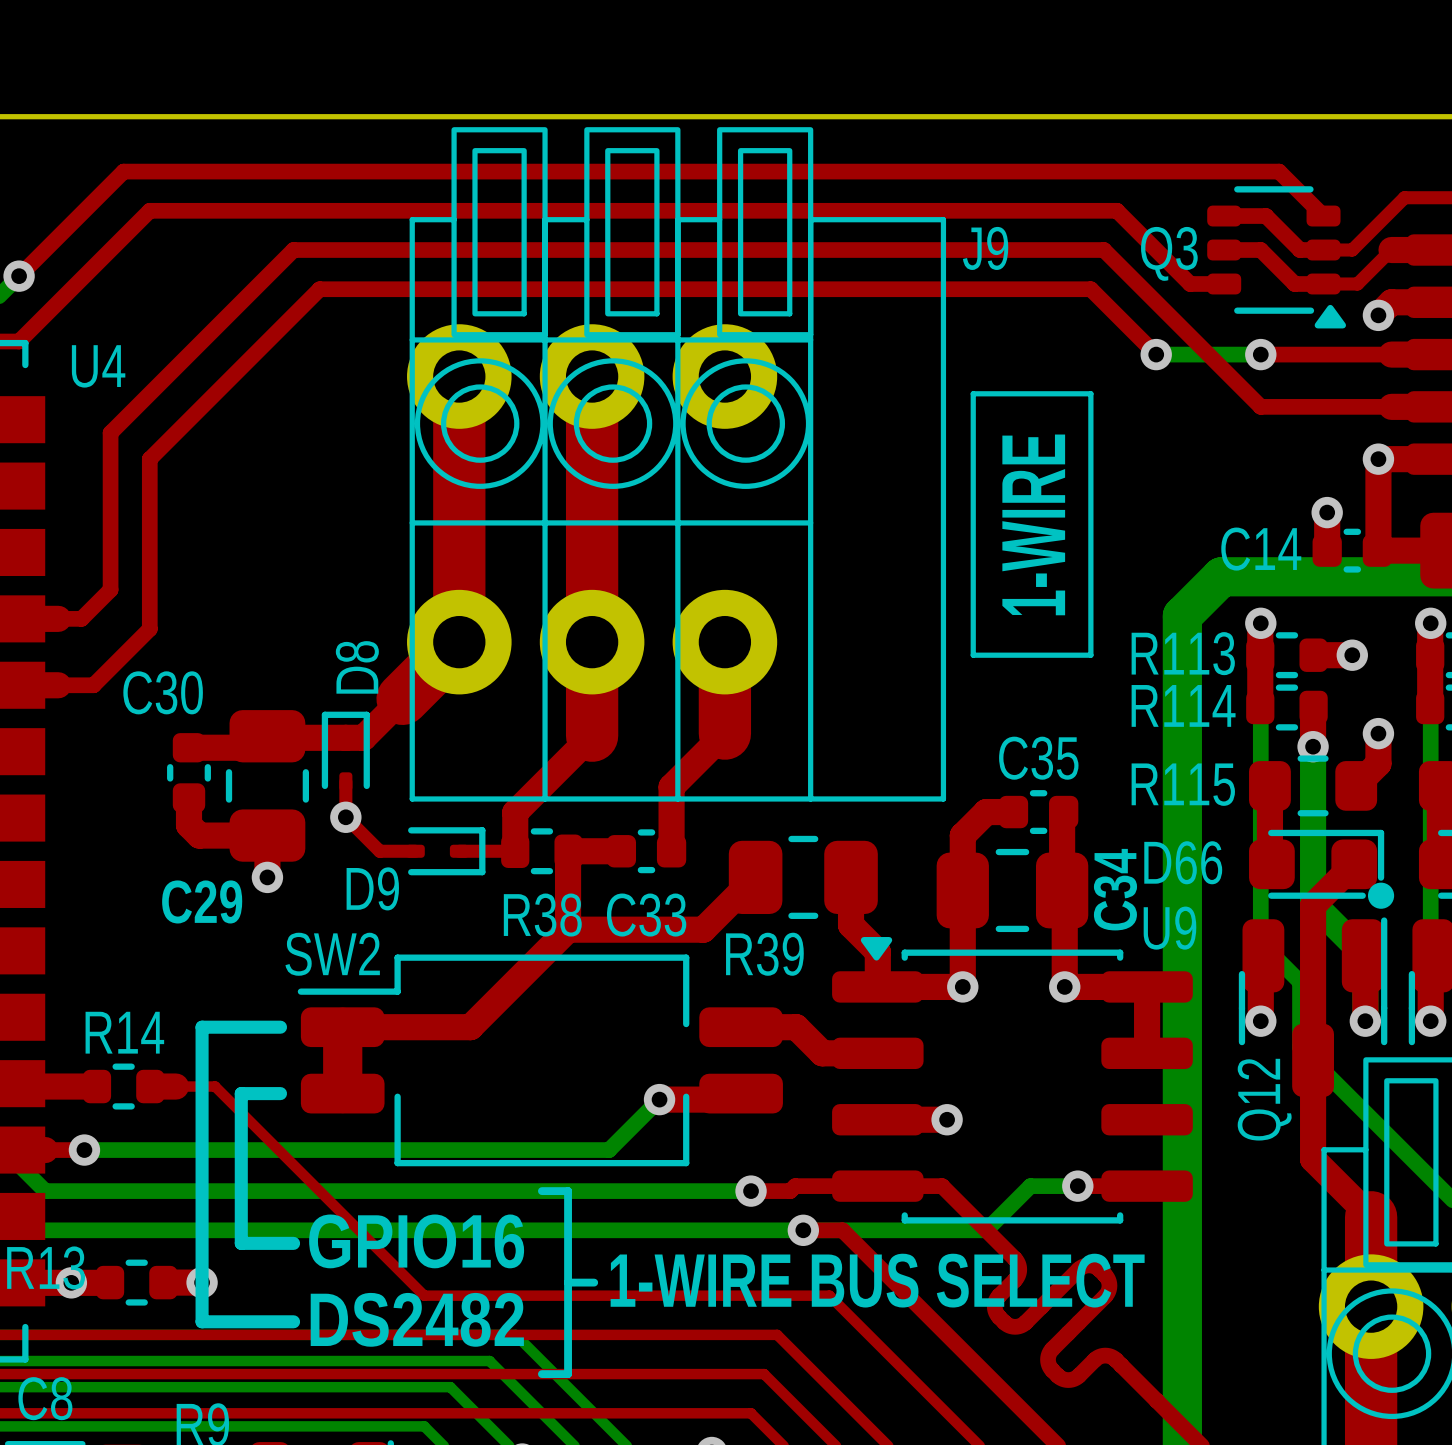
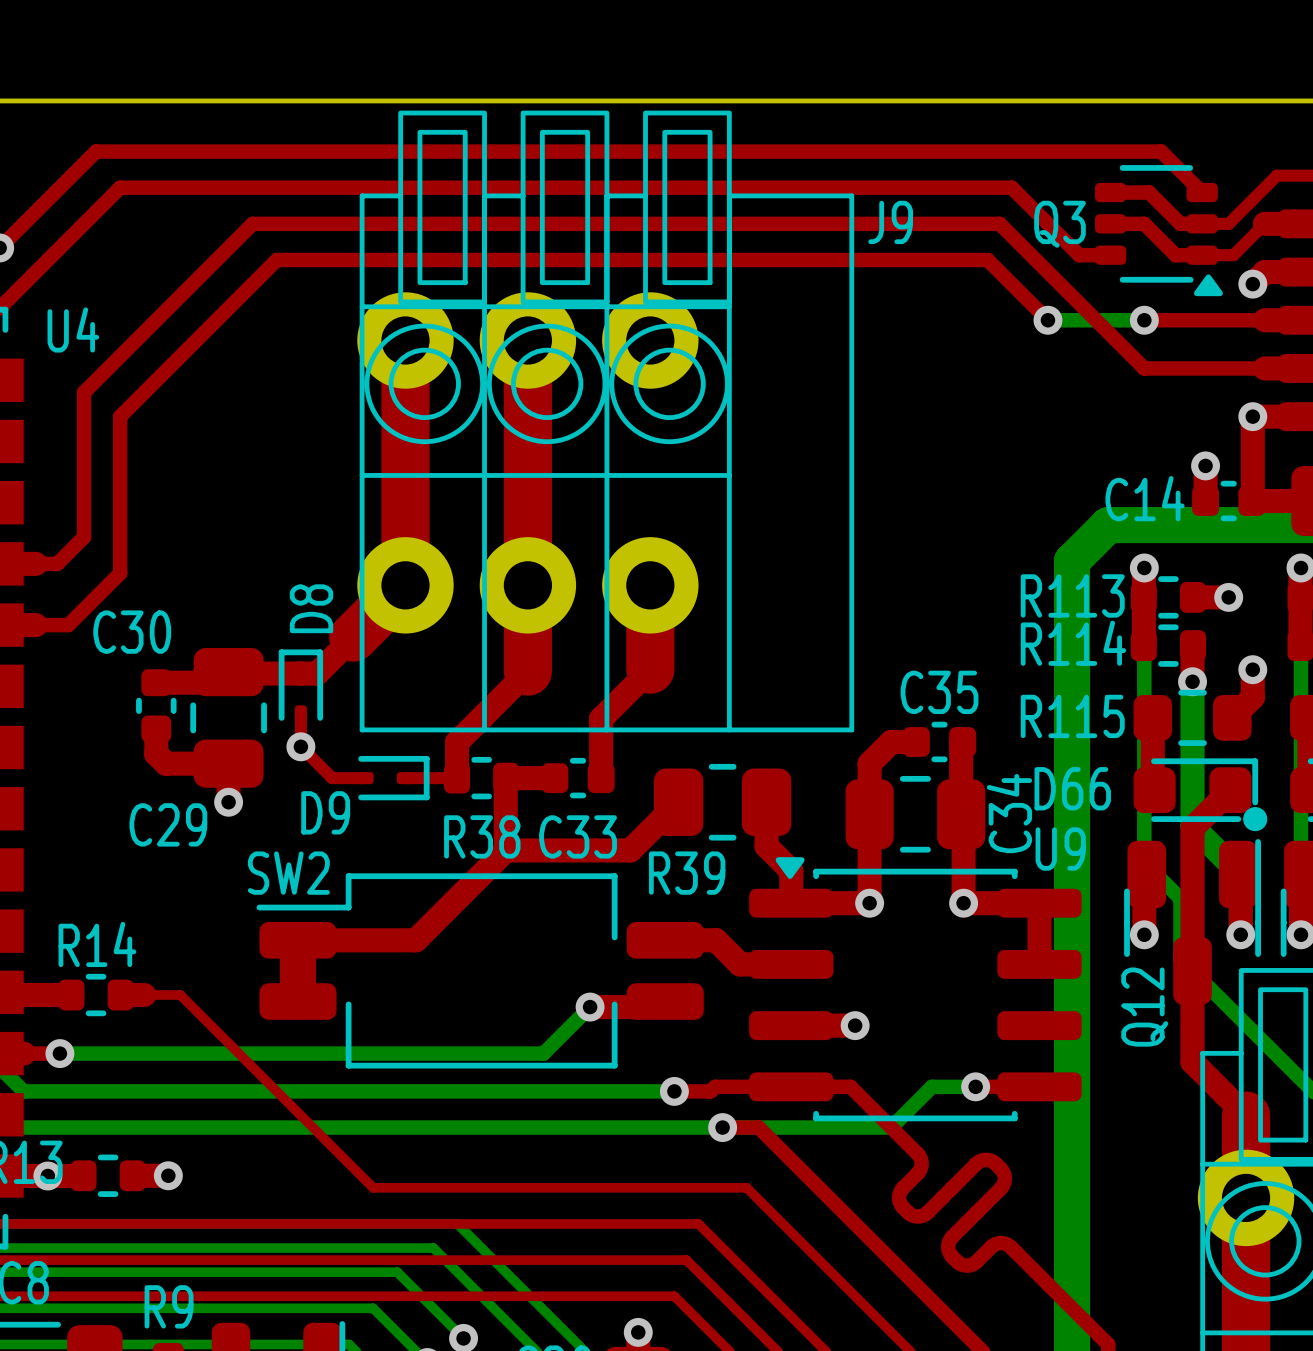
line: (973, 393) (973, 655) (1090, 655) (1090, 393) (973, 393) -> none
text: 1-WIRE (1033, 524) -> none
line: (280, 1027) (202, 1027) (202, 1321) (293, 1321) -> none
line: (280, 1093) (241, 1093) (241, 1243) (293, 1243) -> none
line: (541, 1191) (568, 1191) (568, 1374) (541, 1374) -> none
text: GPIO16 (416, 1241) -> none
text: 1-WIRE BUS SELECT (877, 1280) -> none
line: (568, 1282) (594, 1282) -> none
text: DS2482 (417, 1319) -> none

